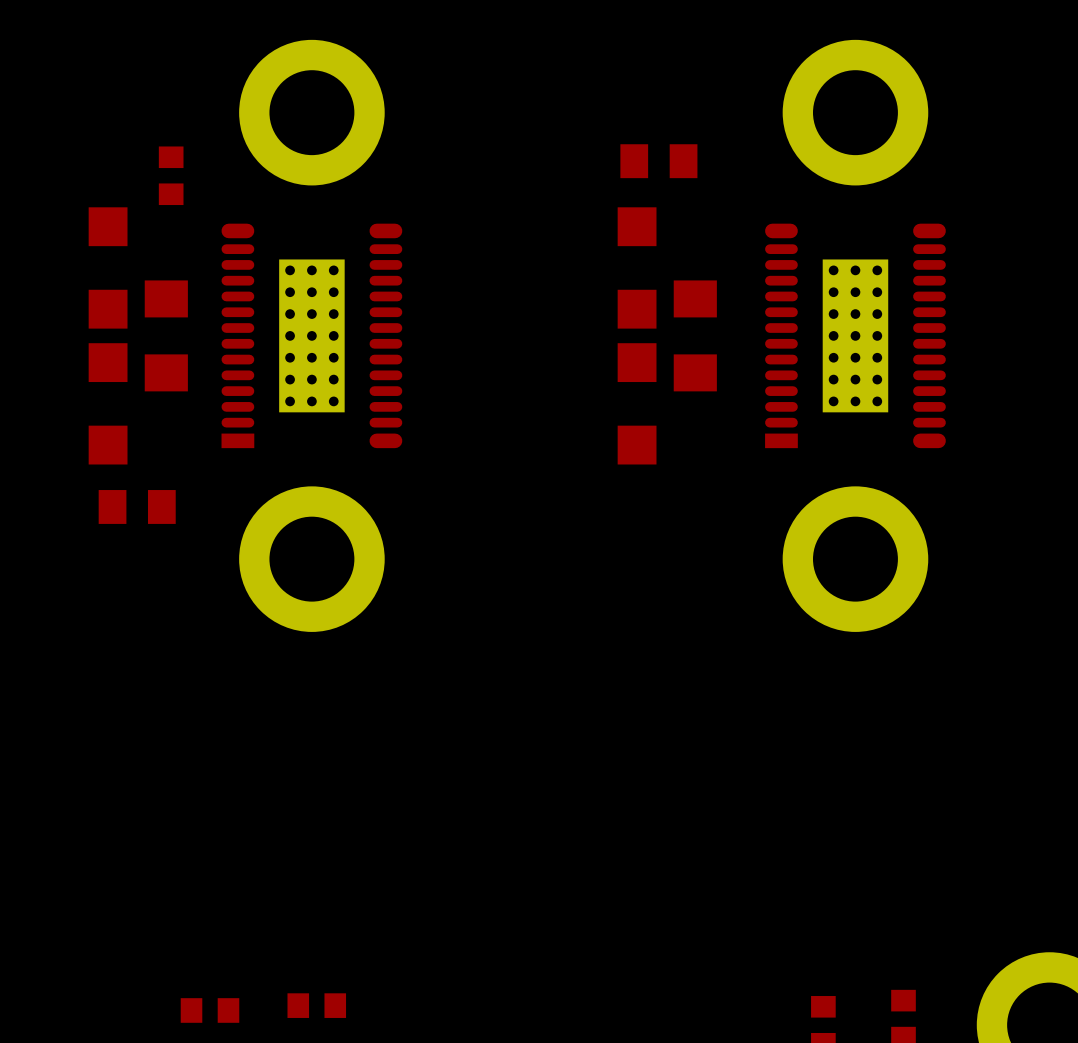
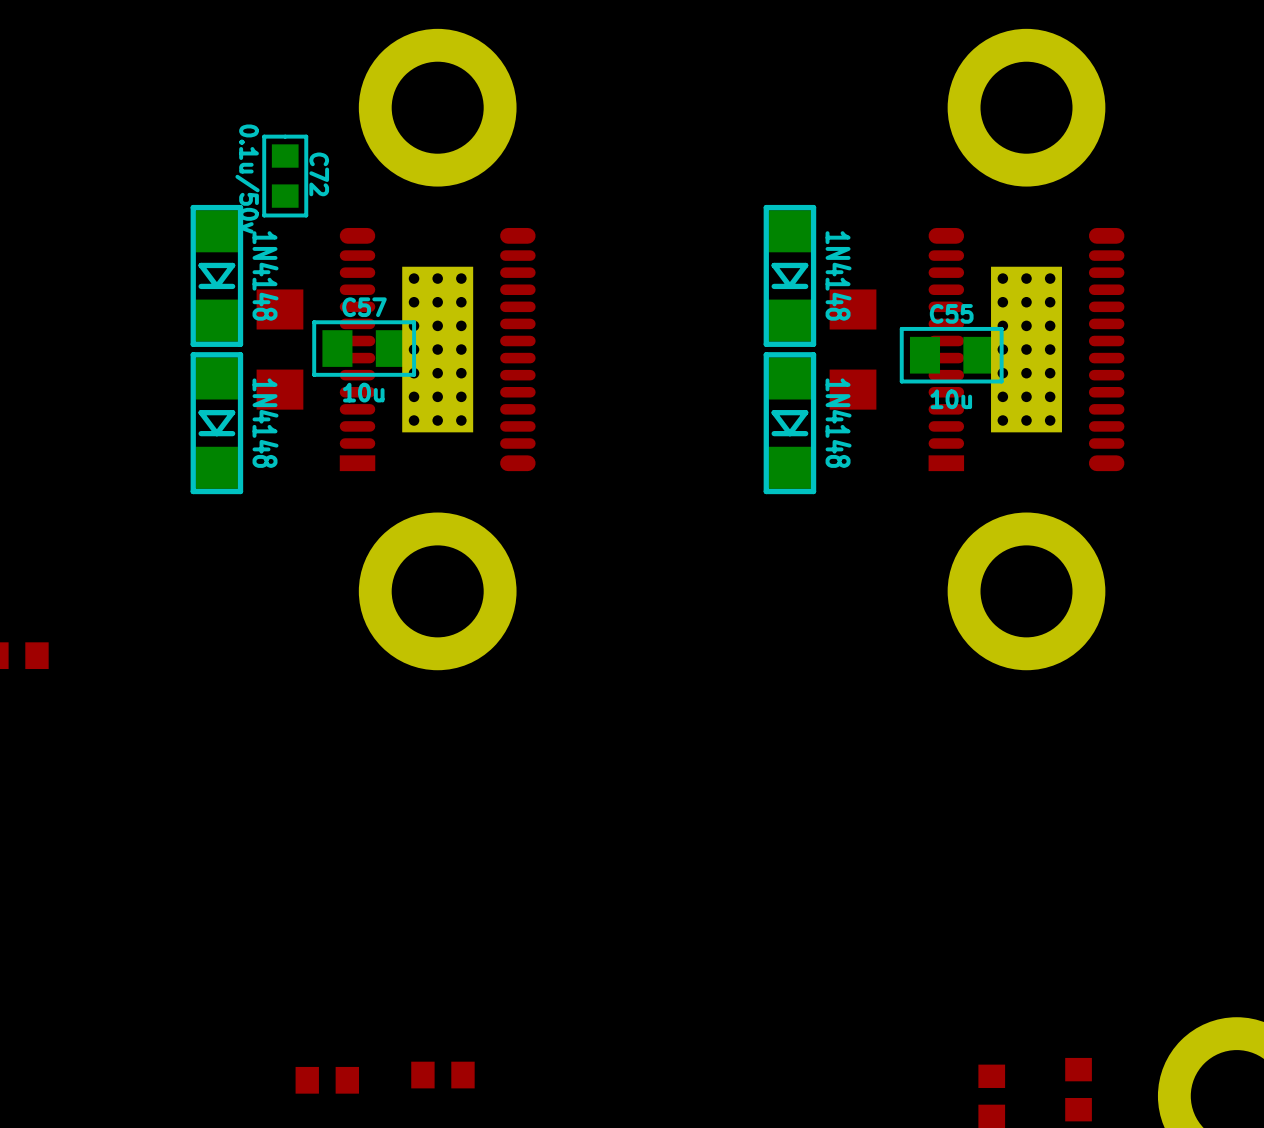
C55 side: top (658, 161) -> bottom (951, 355)
C72 side: top (171, 175) -> bottom (285, 176)
part side: top (108, 267) -> bottom (216, 275)
part side: top (637, 267) -> bottom (789, 275)
part side: top (108, 403) -> bottom (216, 423)
part side: top (637, 403) -> bottom (789, 423)
C57 side: top (137, 506) -> bottom (364, 348)

